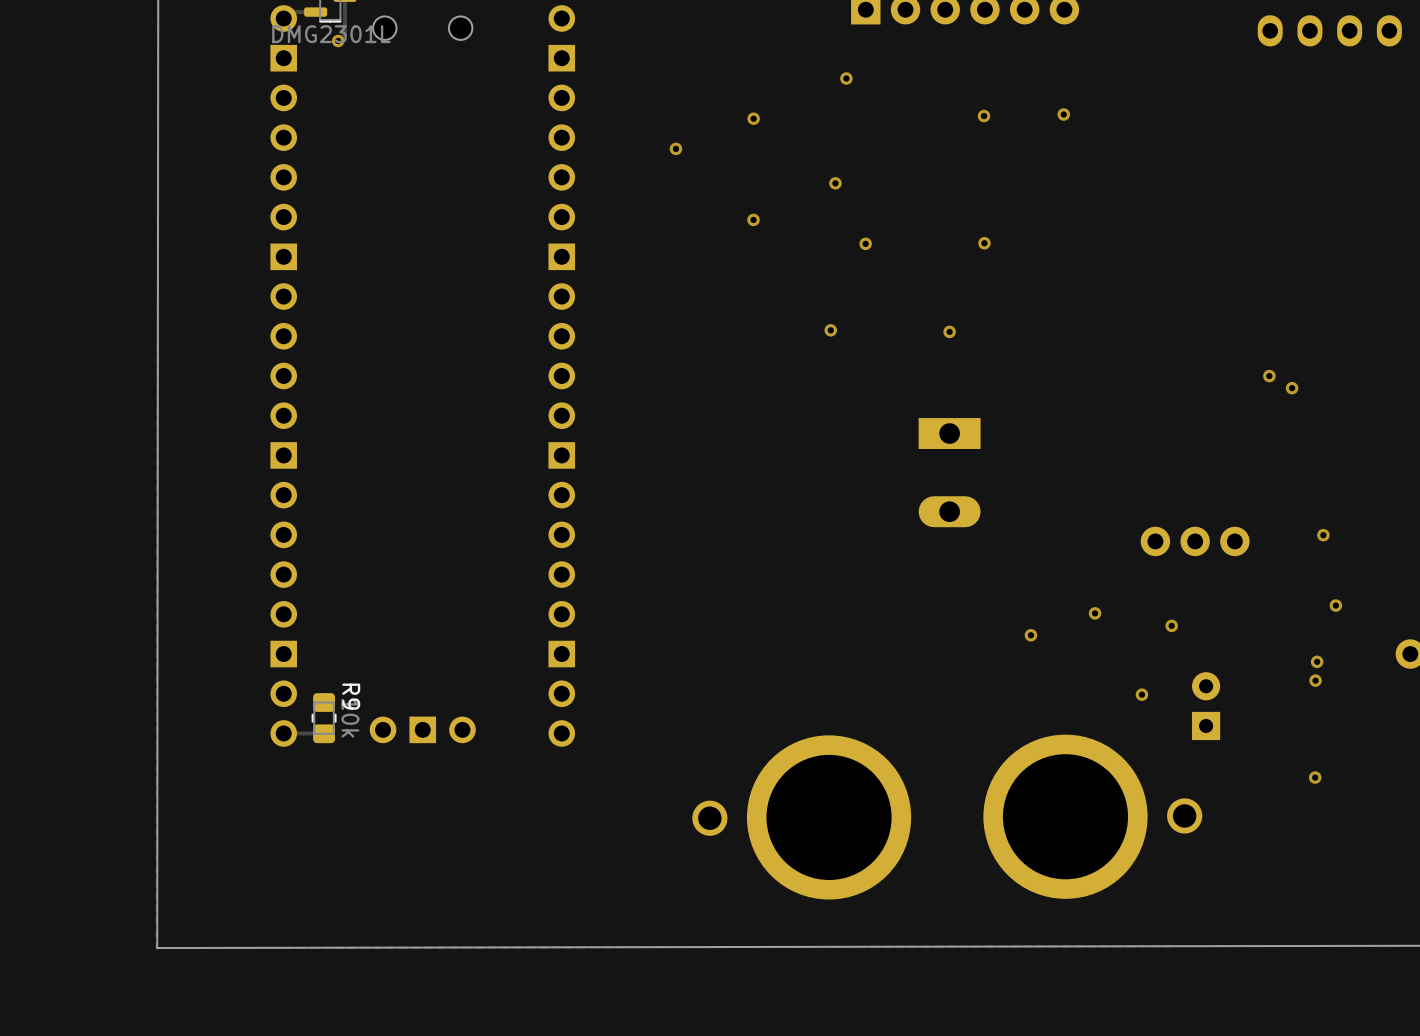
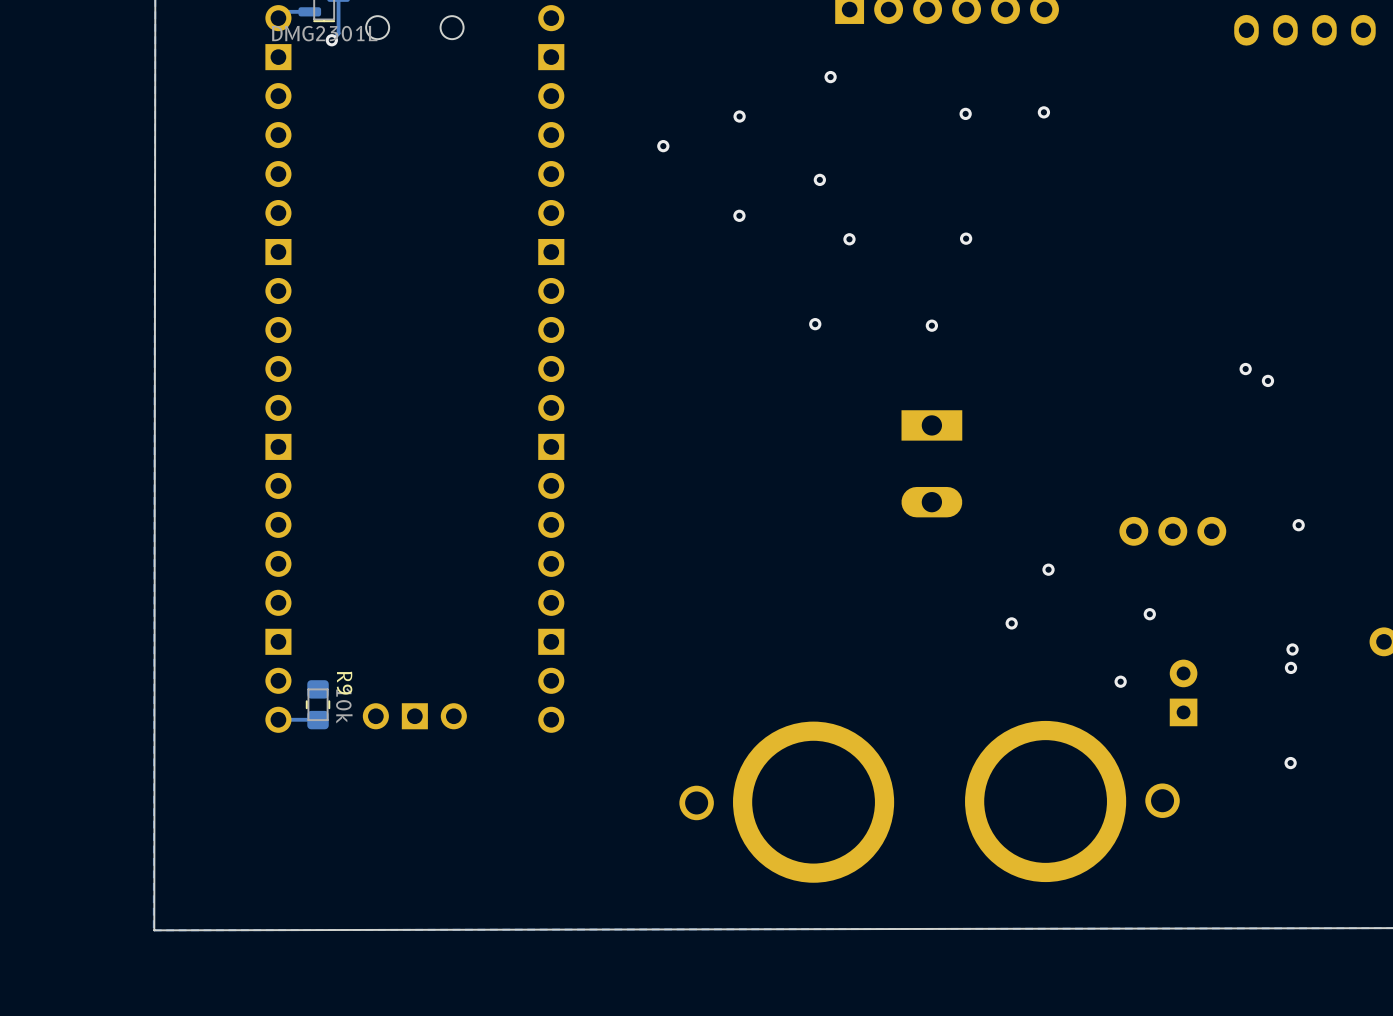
via: (1335, 605) -> none
via position: (1095, 613) -> (1048, 569)

